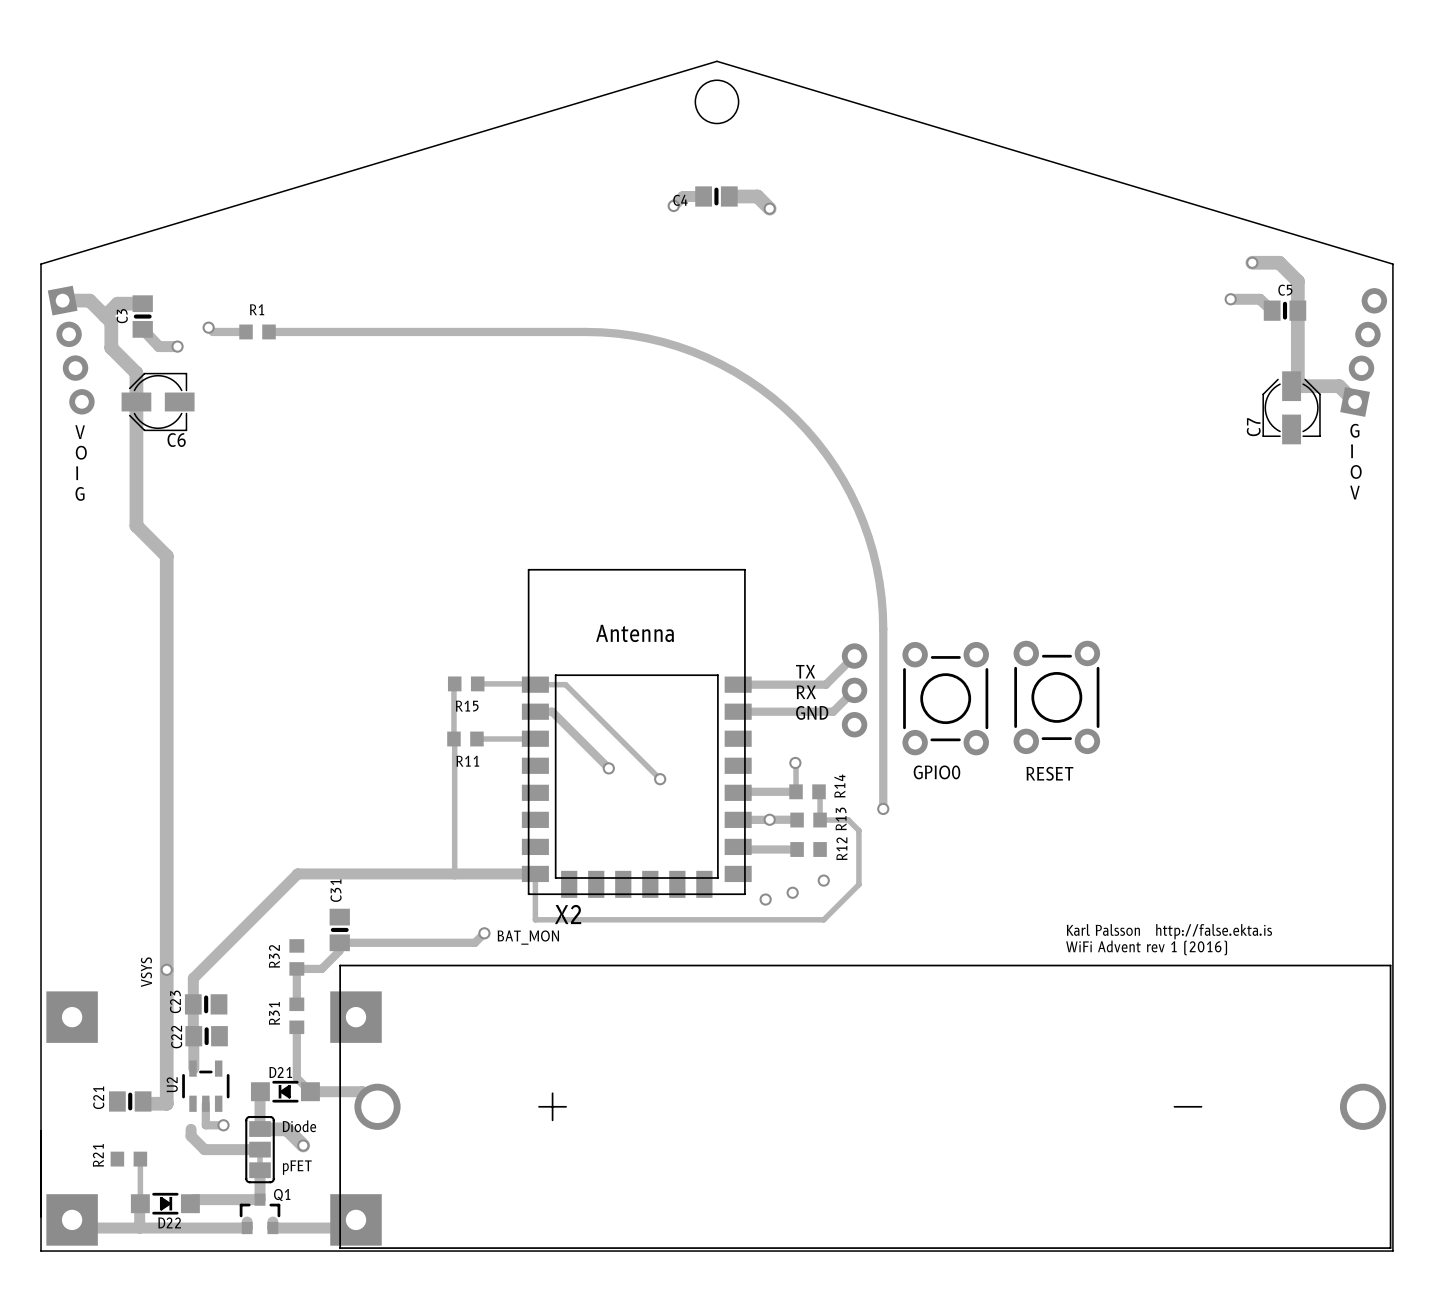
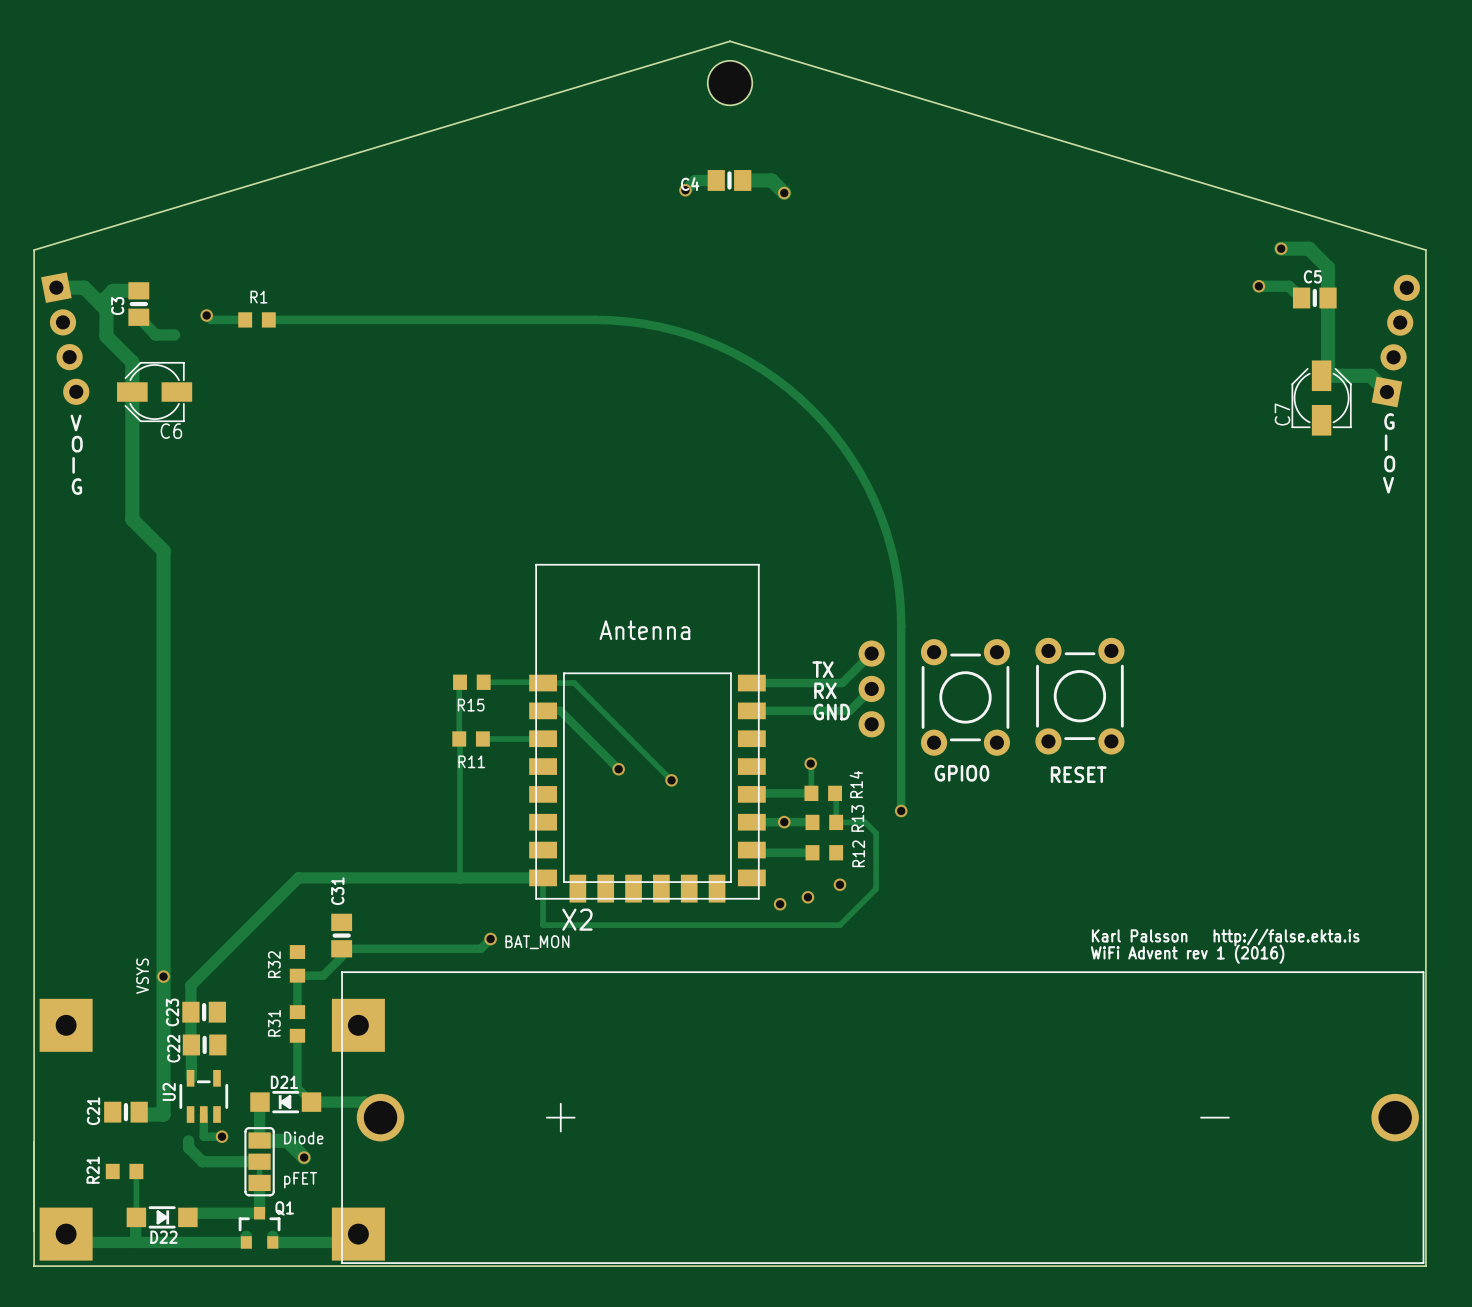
via: (177, 346) -> none

